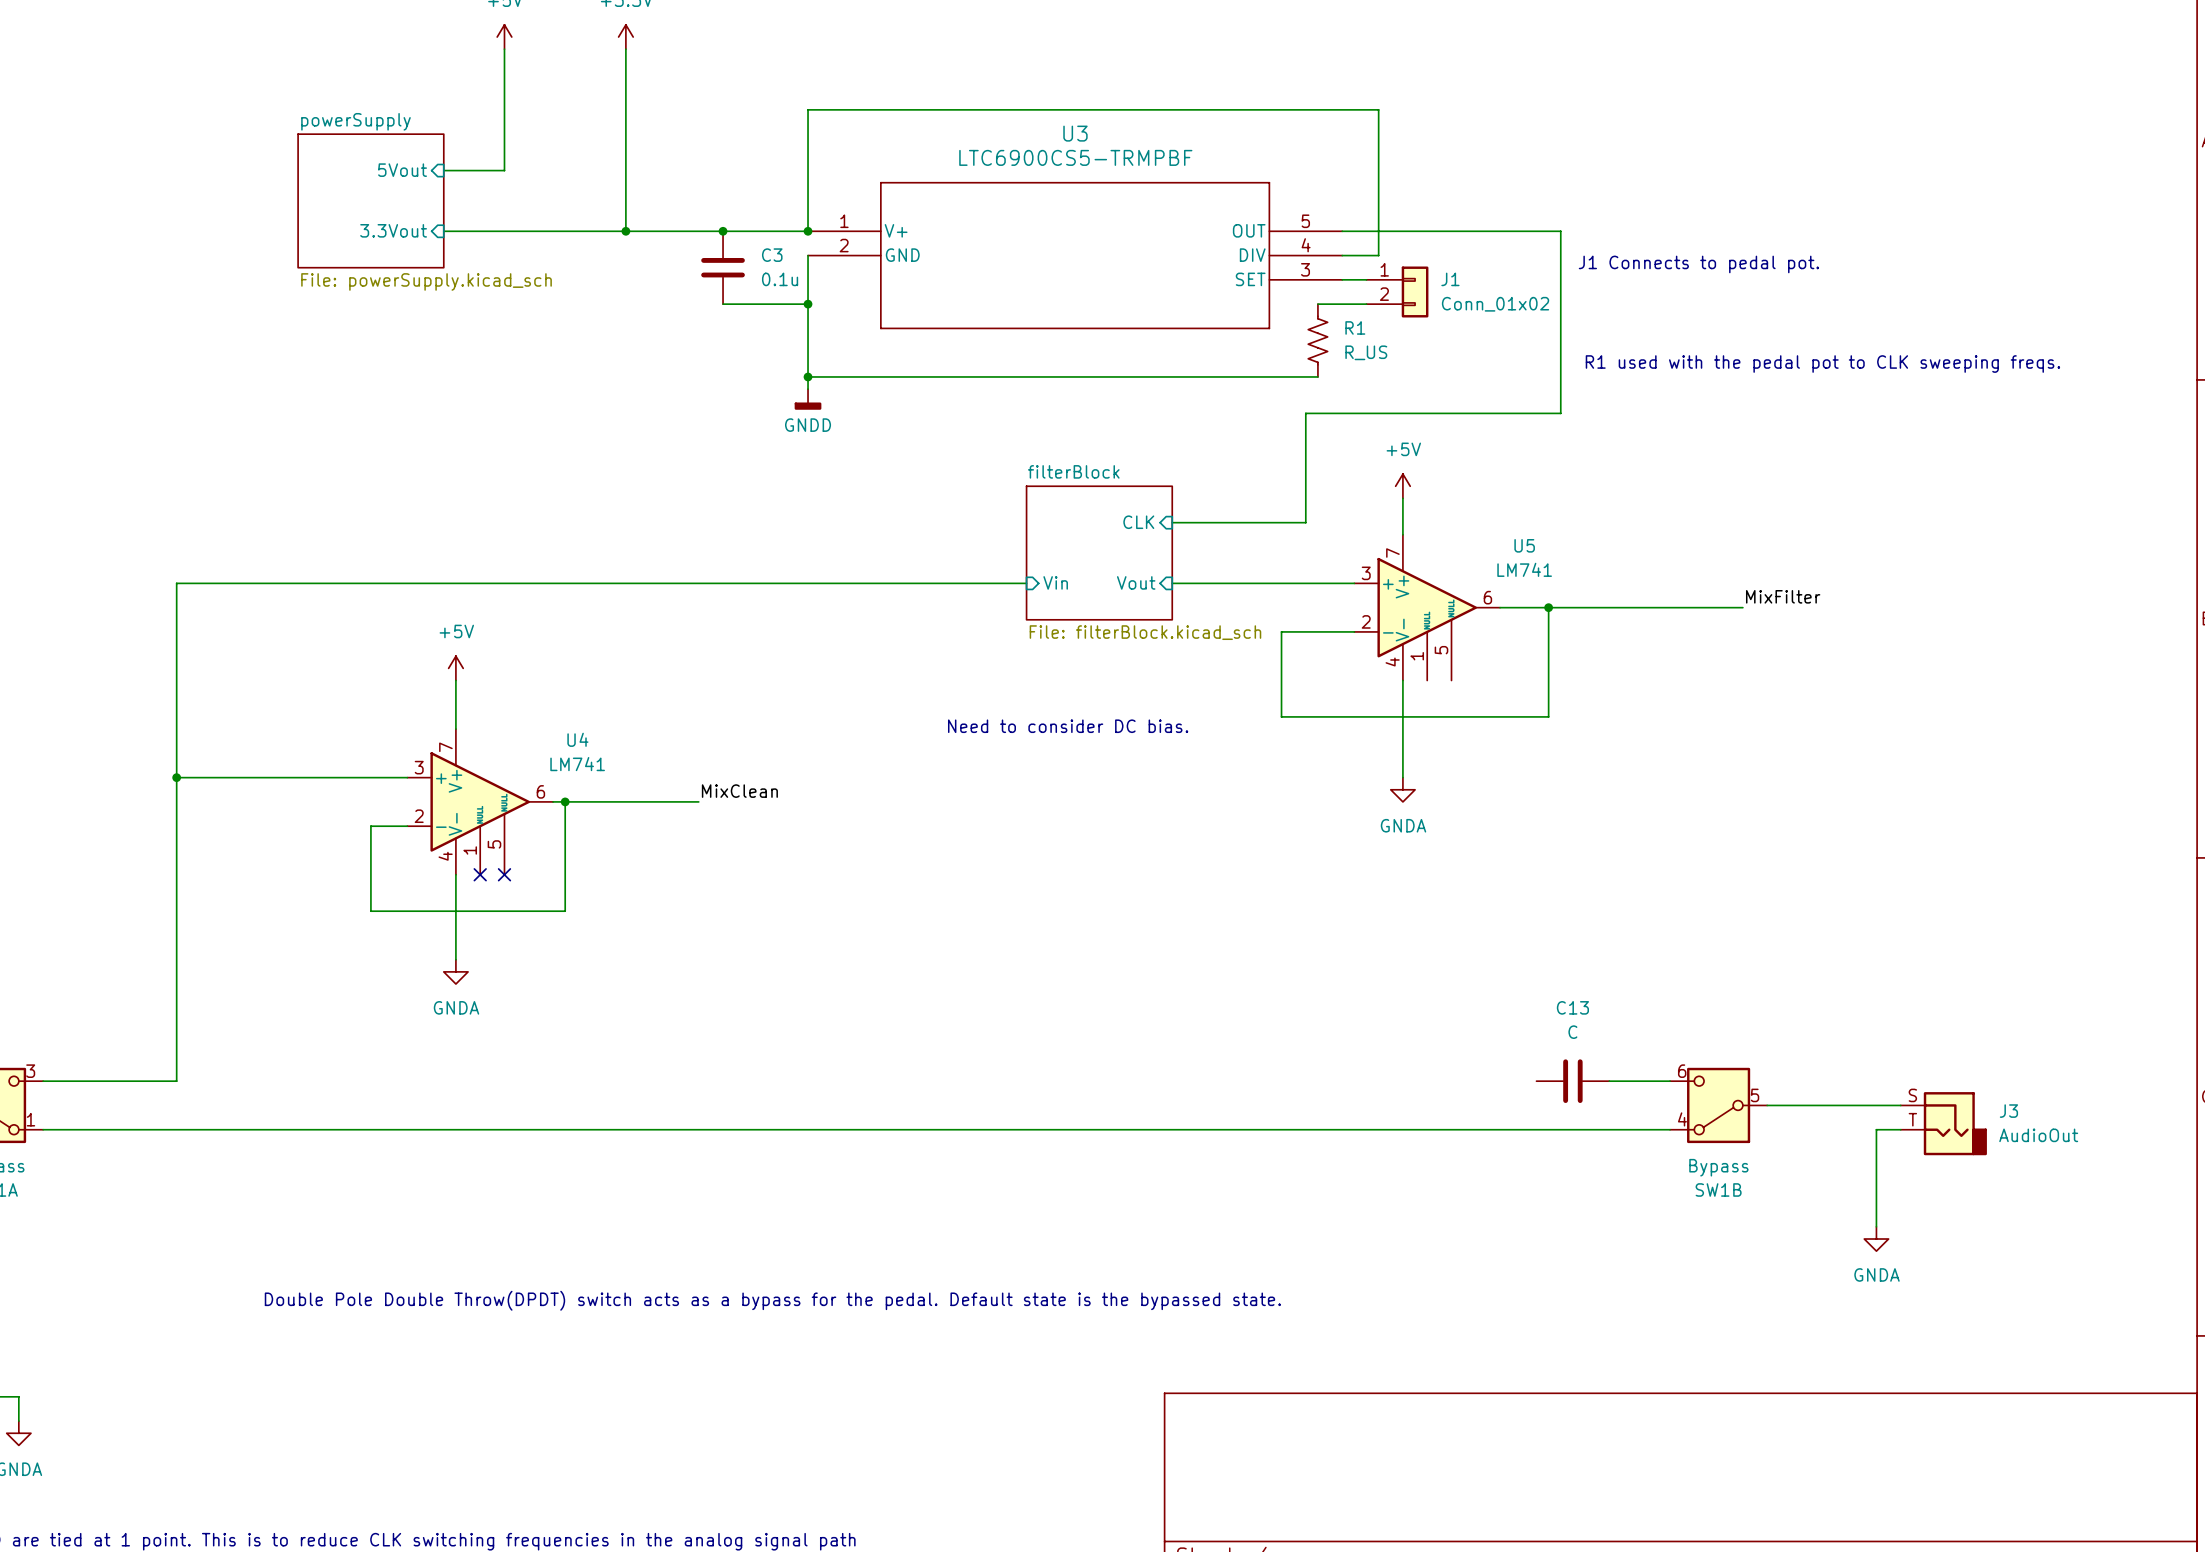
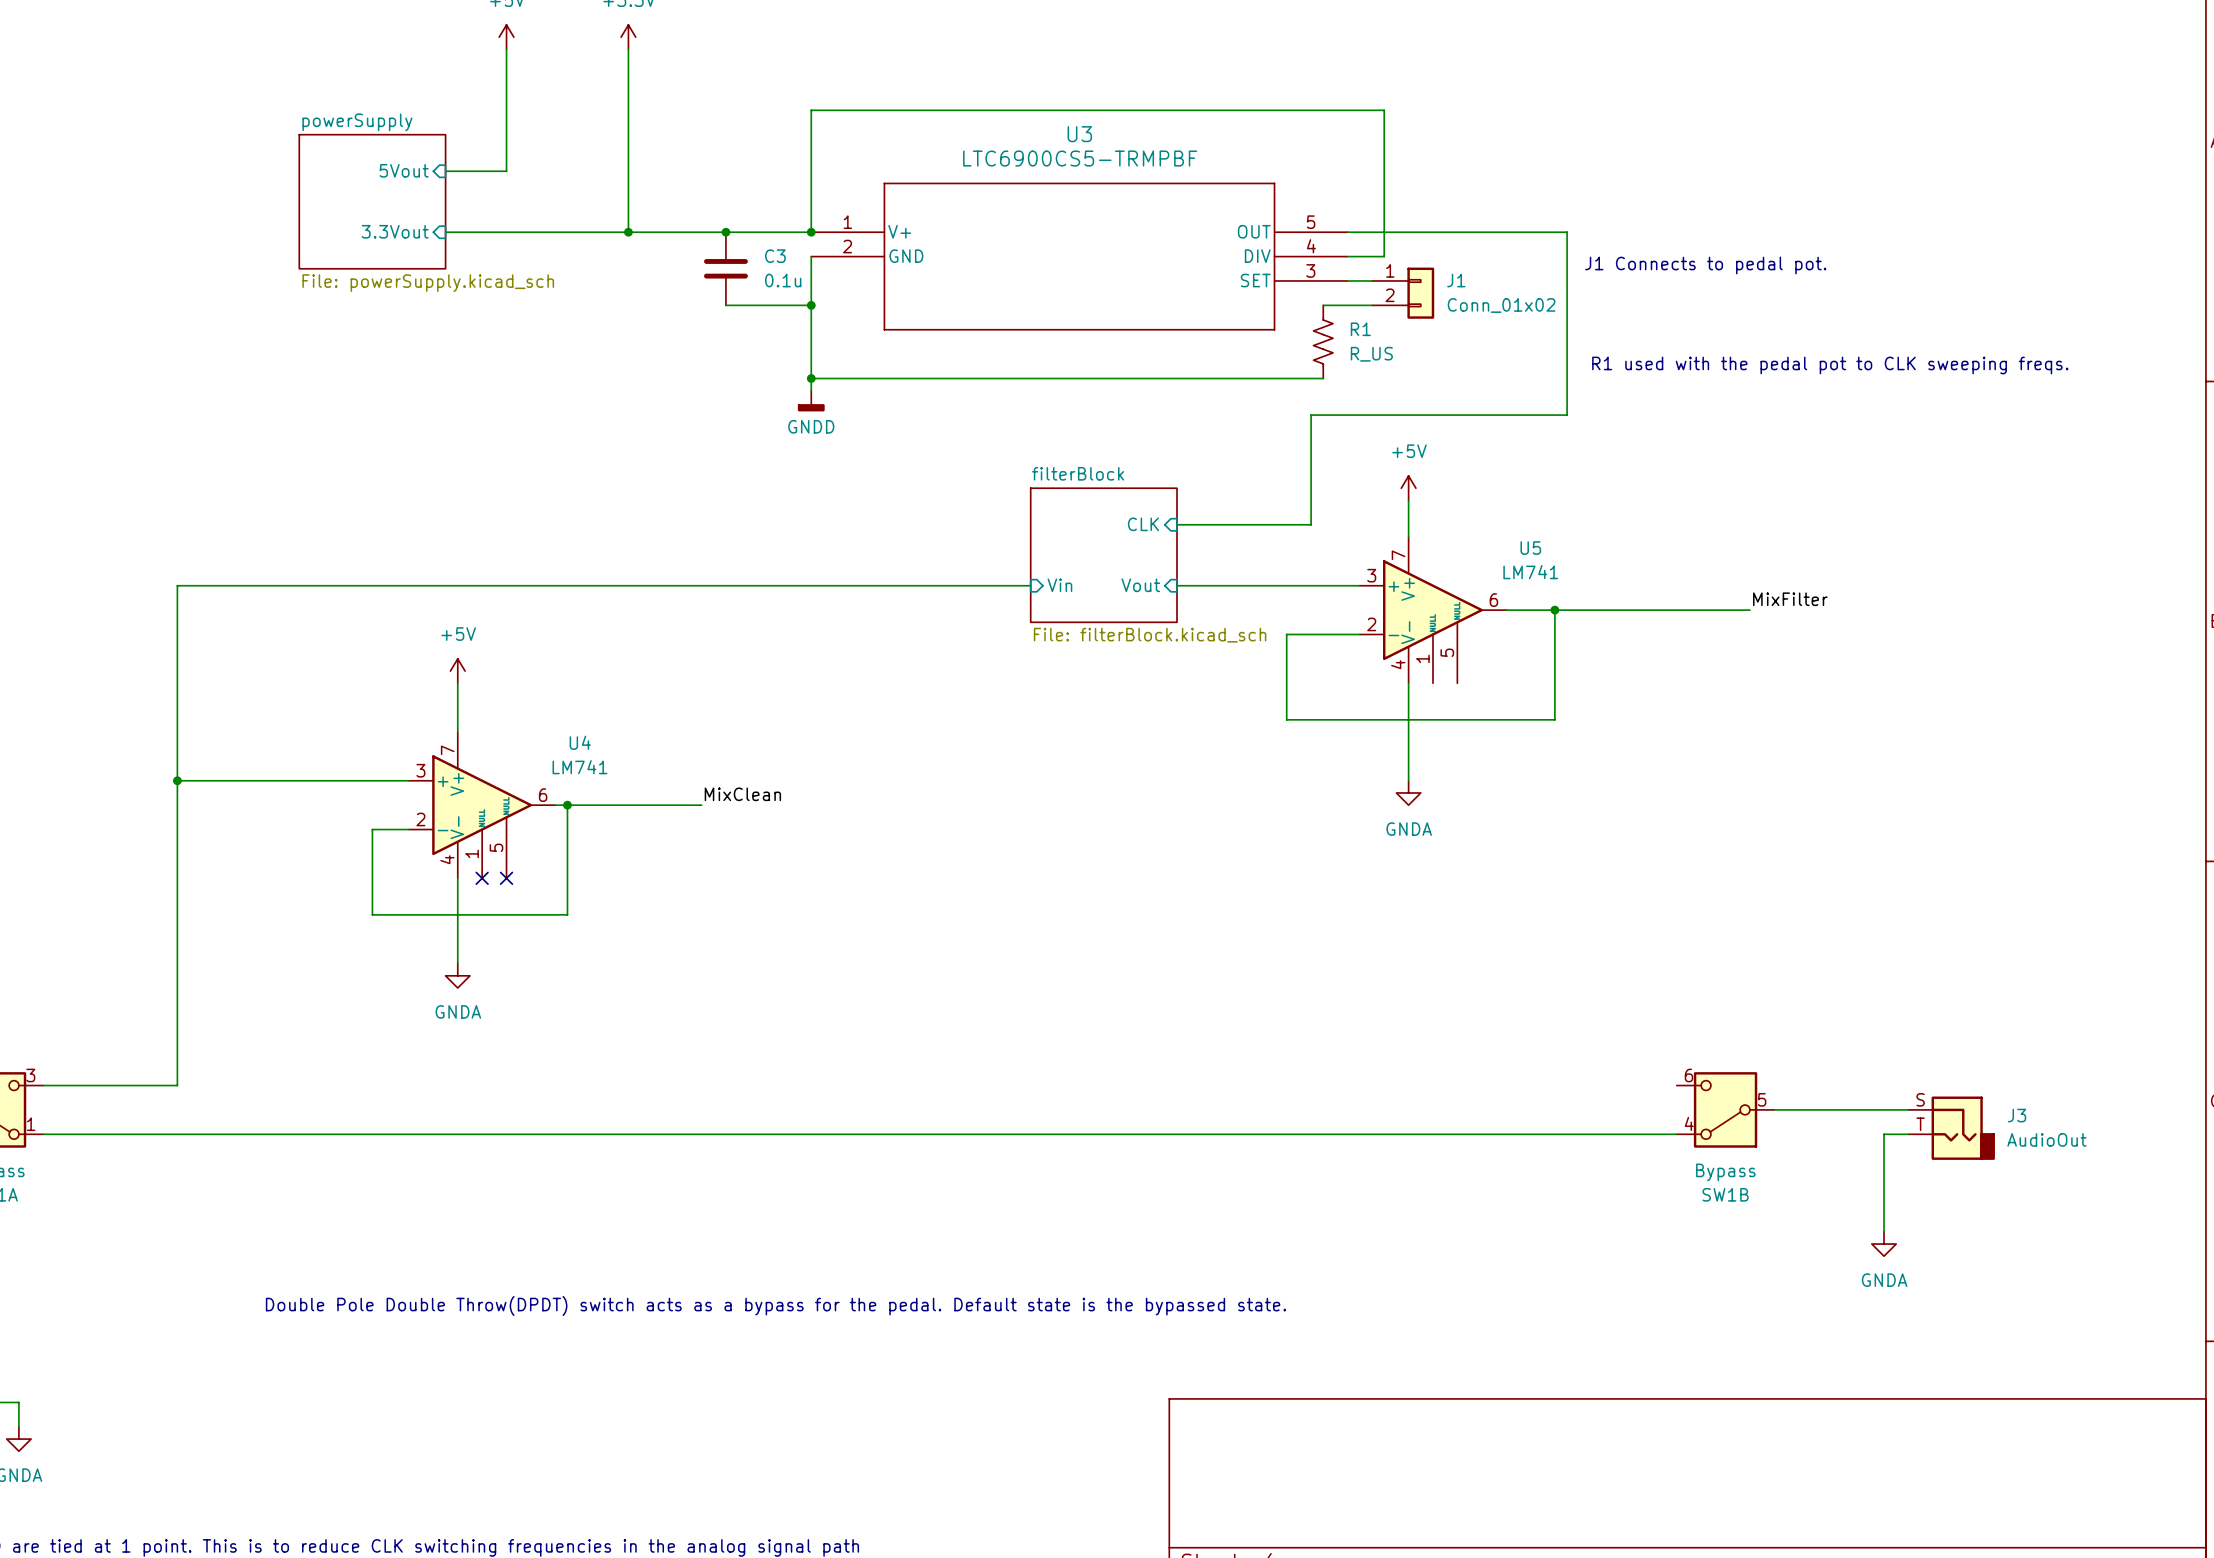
text: Need to consider DC bias. (1068, 726) -> none
C13: C (1572, 1081) -> none
wire: (1609, 1081) (1670, 1081) -> none

